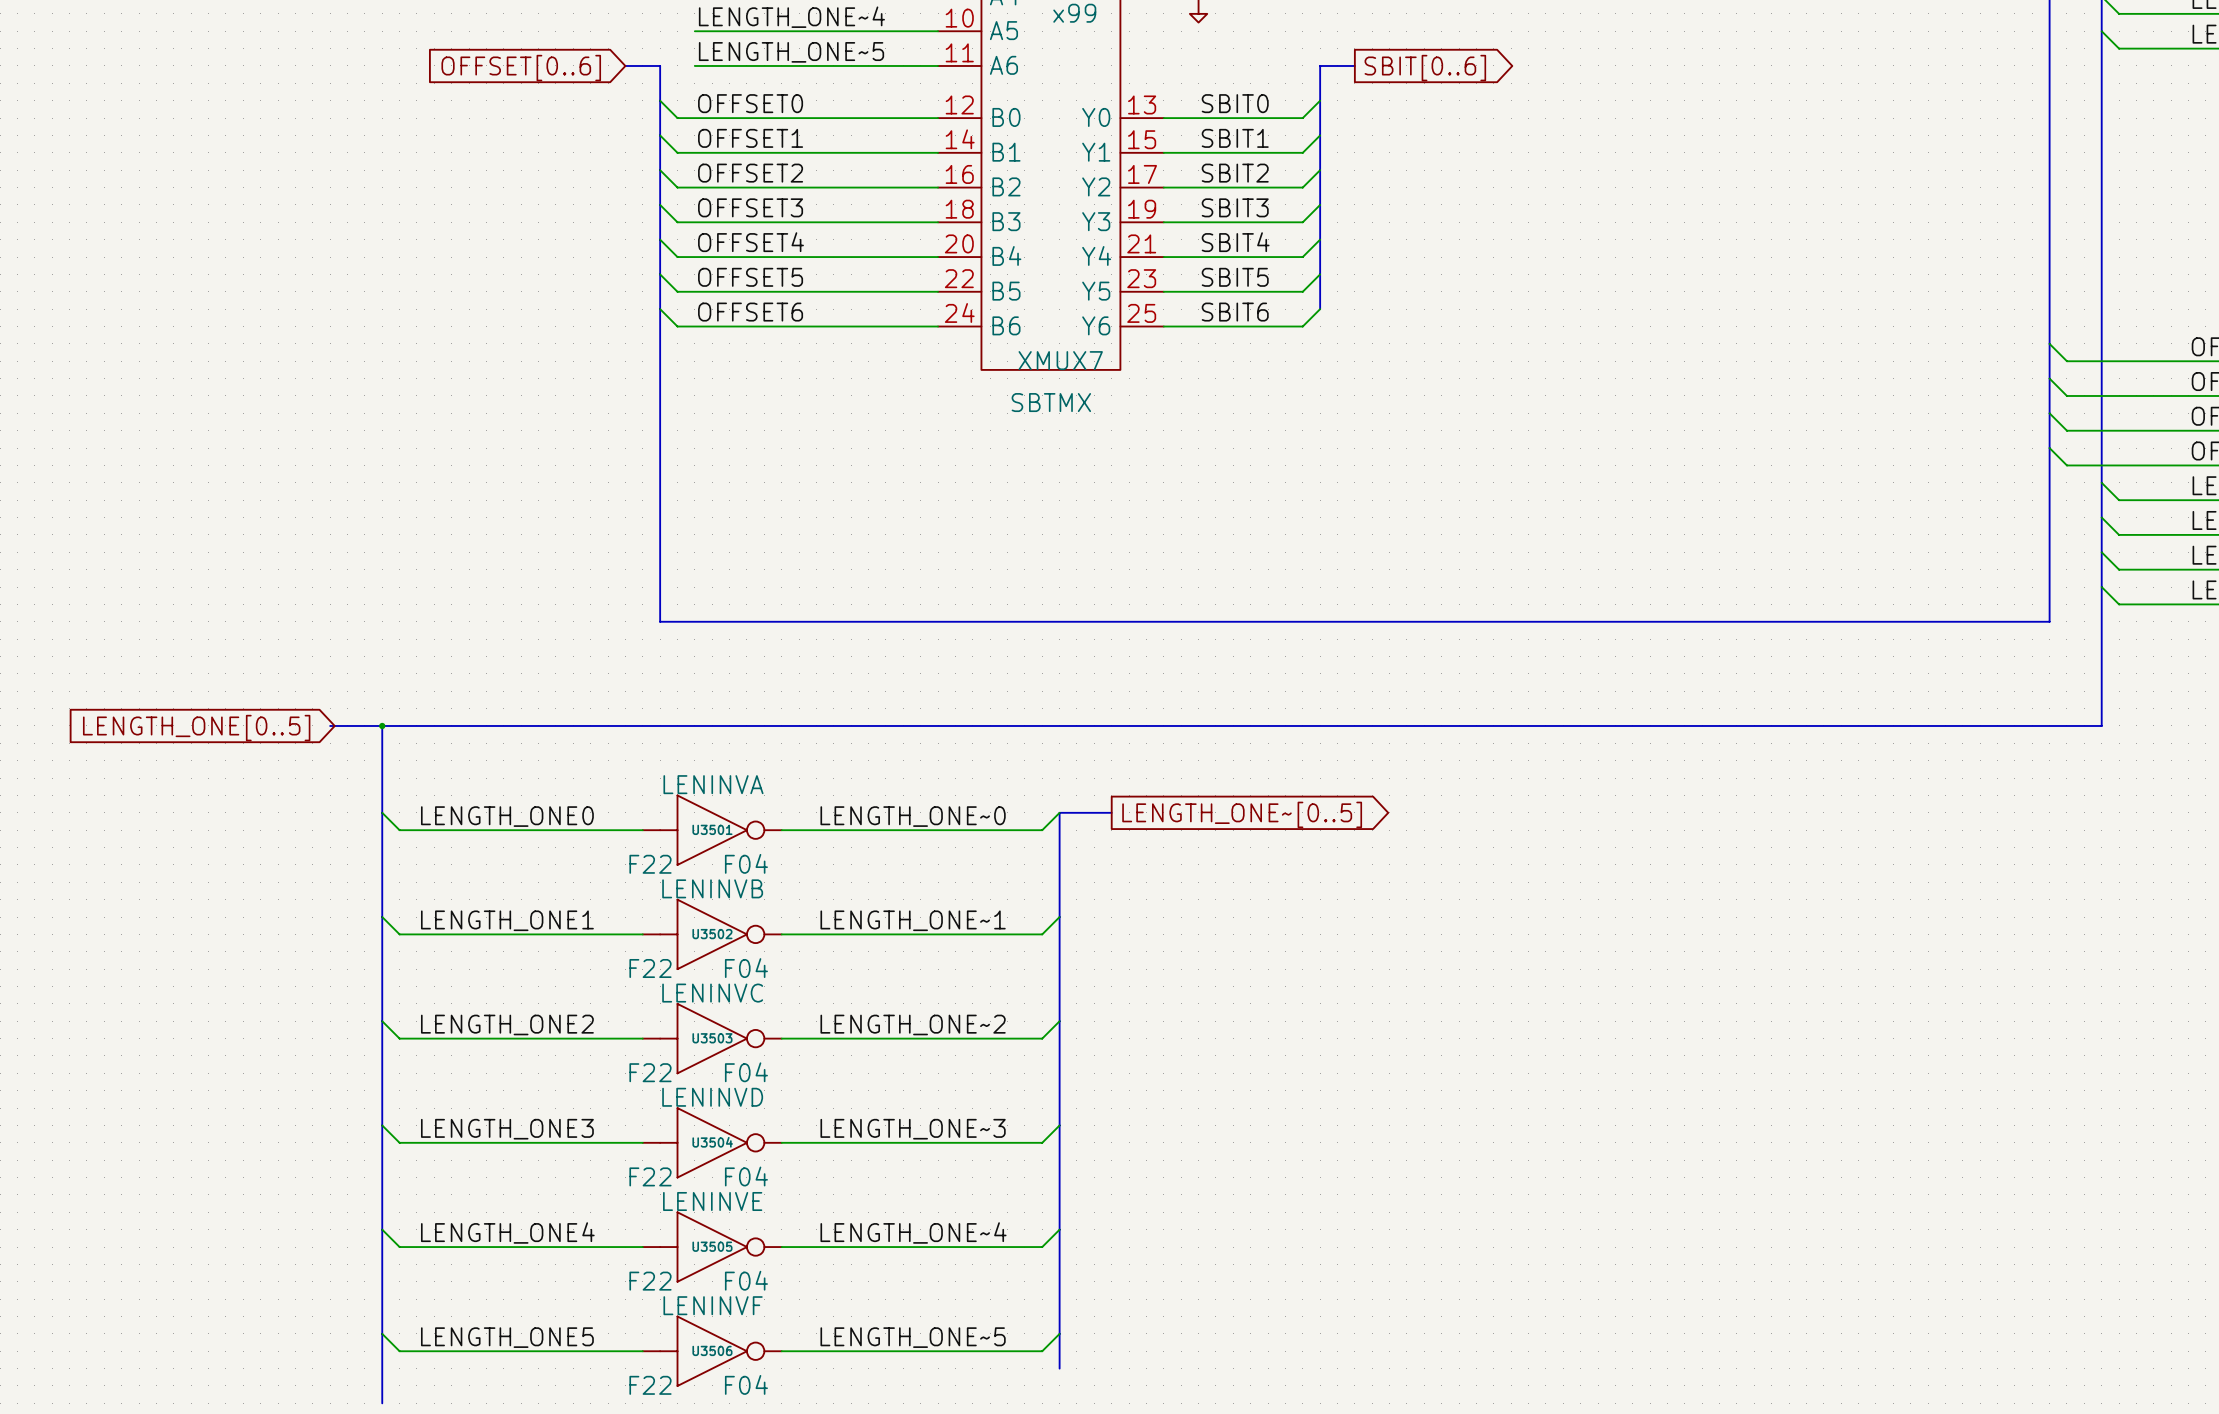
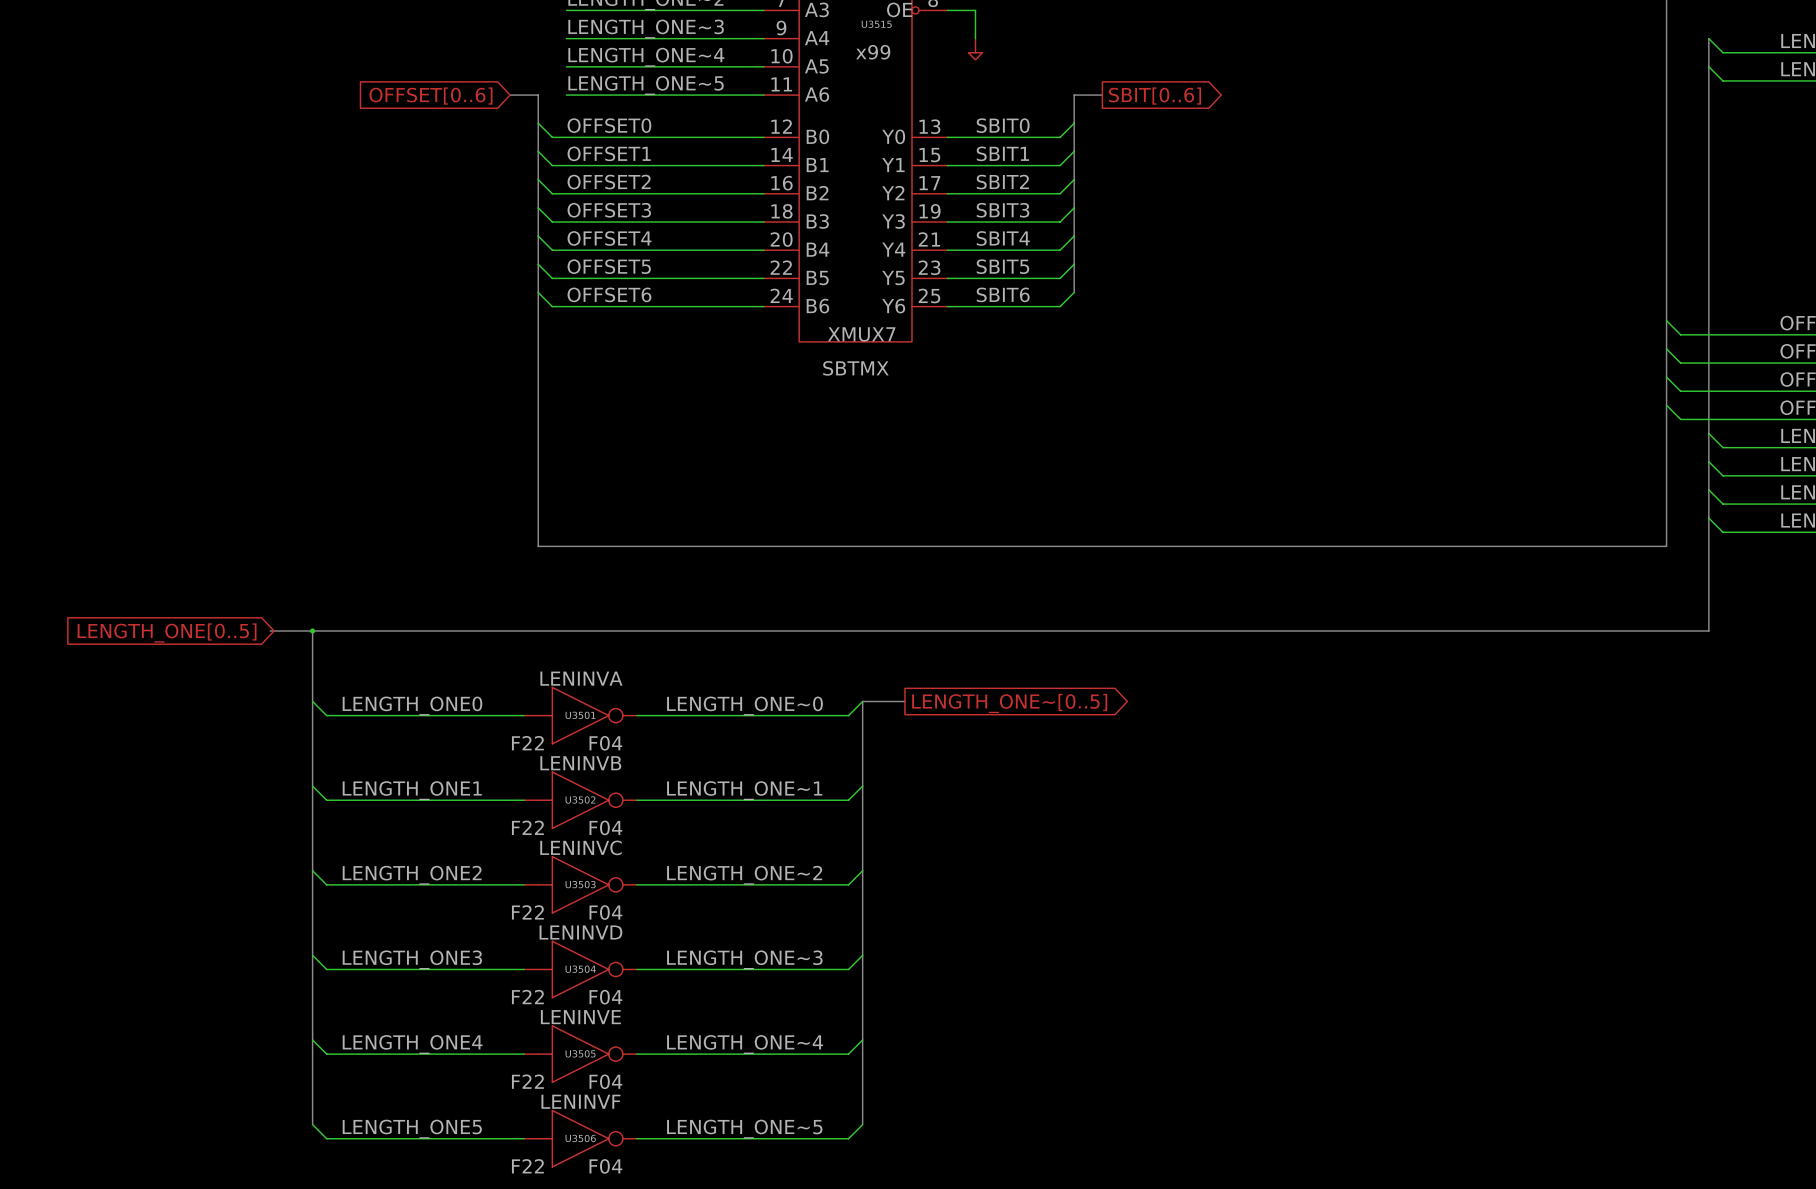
bus: (382, 1333) (382, 1403) -> none
bus: (1059, 1333) (1059, 1368) -> none

